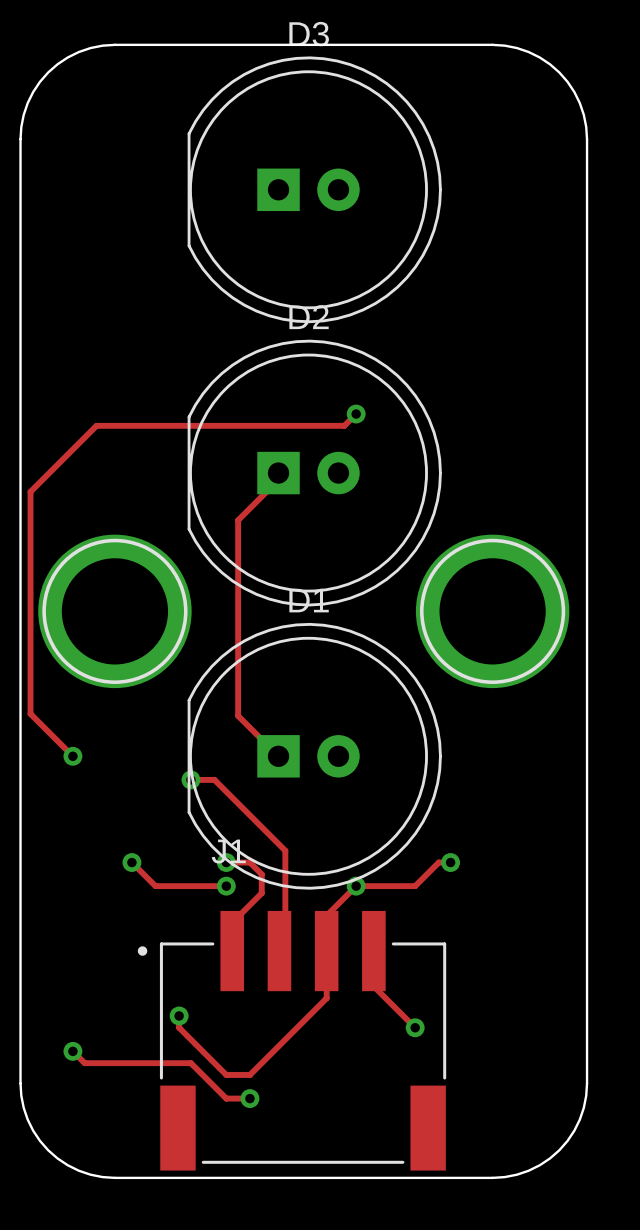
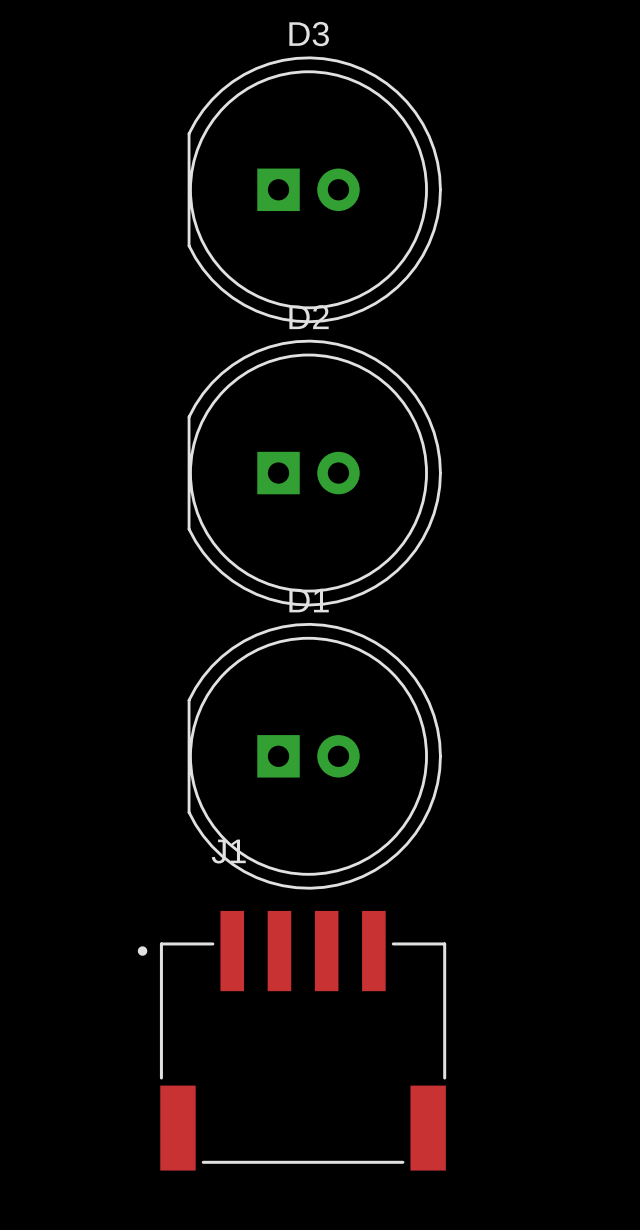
track: (356, 414) (344, 425) (96, 425) (30, 491) (30, 713) (72, 756) -> none
via: (356, 414) -> none
track: (278, 473) (278, 479) (238, 520) (238, 715) (278, 756) -> none
part: (303, 611) -> none
via: (72, 756) -> none
track: (190, 779) (214, 779) (285, 850) (285, 945) (279, 951) -> none
via: (190, 779) -> none
track: (131, 862) (155, 886) (226, 886) -> none
via: (131, 862) -> none
track: (226, 862) (249, 862) (261, 874) (261, 893) (232, 922) (232, 951) -> none
via: (226, 862) -> none
track: (450, 862) (438, 862) (415, 886) (356, 886) (326, 915) (326, 998) (249, 1074) (226, 1074) (179, 1027) (179, 1015) -> none
via: (450, 862) -> none
via: (226, 886) -> none
via: (356, 886) -> none
track: (373, 951) (373, 986) (415, 1027) -> none
via: (179, 1015) -> none
via: (415, 1027) -> none
track: (72, 1051) (84, 1063) (190, 1063) (226, 1098) (249, 1098) -> none
via: (72, 1051) -> none
via: (249, 1098) -> none

